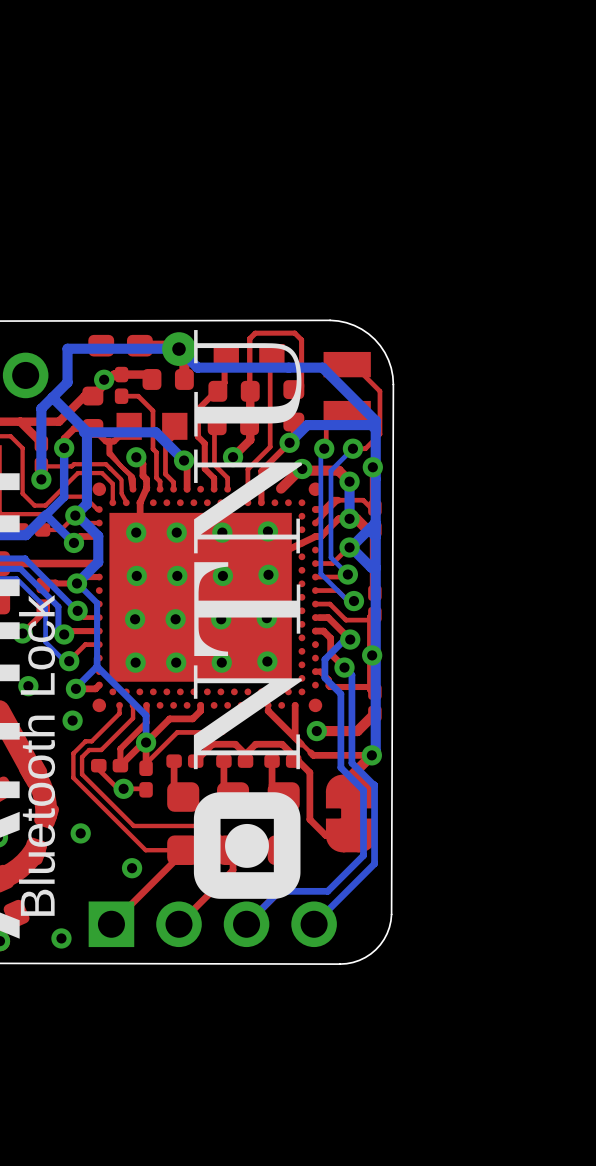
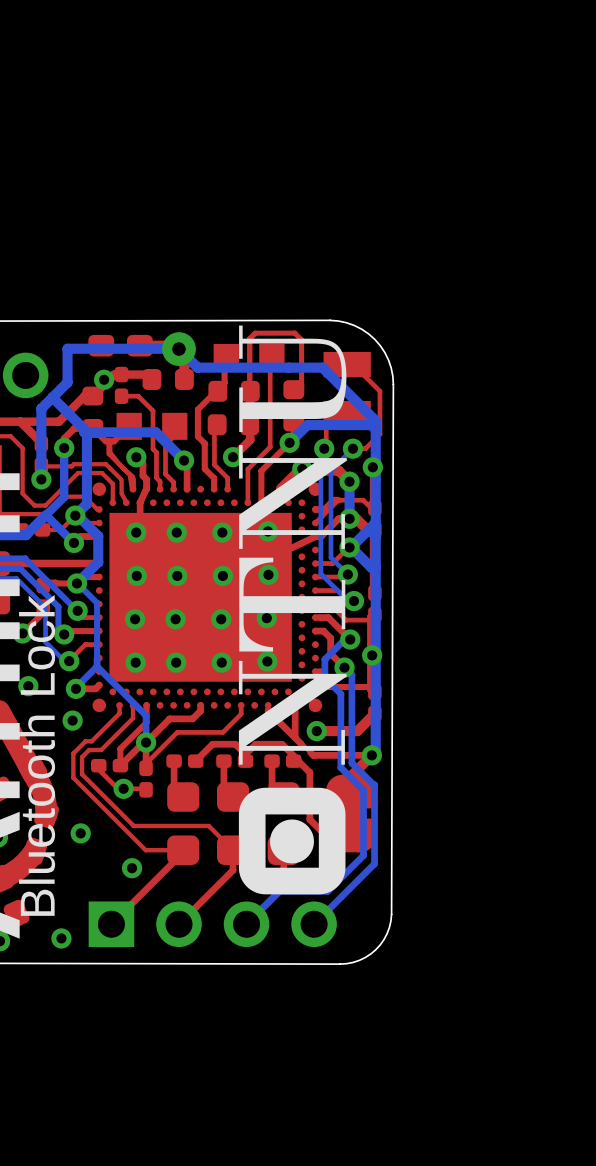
drawing position: (247, 383) -> (292, 378)
drawing position: (248, 501) -> (293, 496)
drawing position: (247, 609) -> (292, 604)
drawing position: (247, 717) -> (292, 712)
drawing position: (247, 845) -> (292, 841)
drawing position: (247, 845) -> (292, 841)

